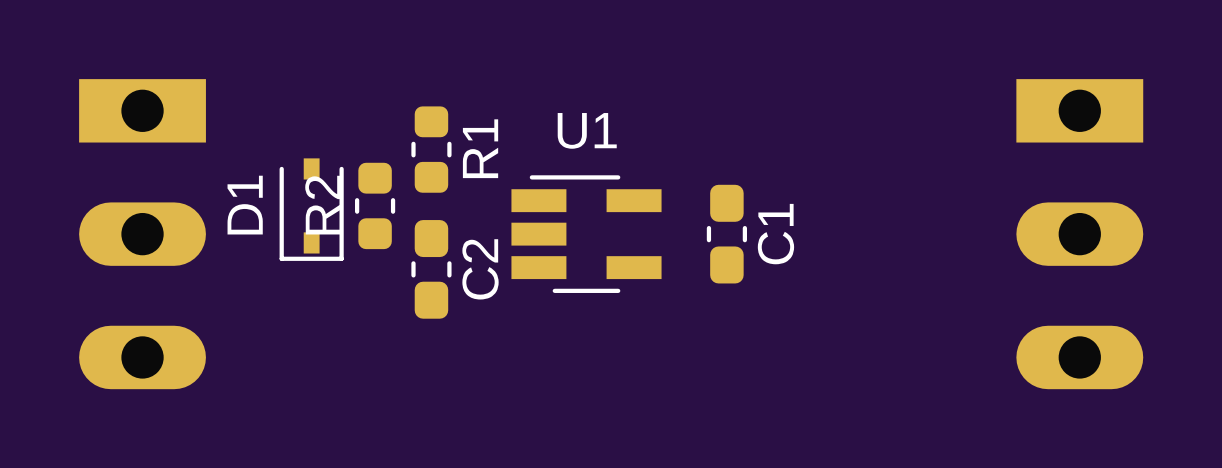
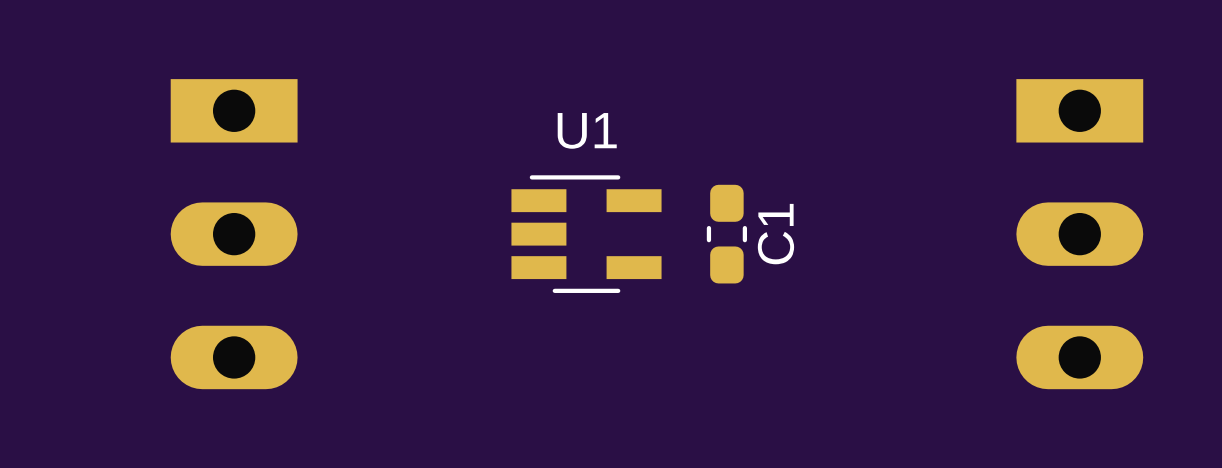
R1: (431, 149) -> none
R2: (375, 205) -> none
D1: (311, 209) -> none
part position: (142, 234) -> (234, 234)
C2: (431, 269) -> none

